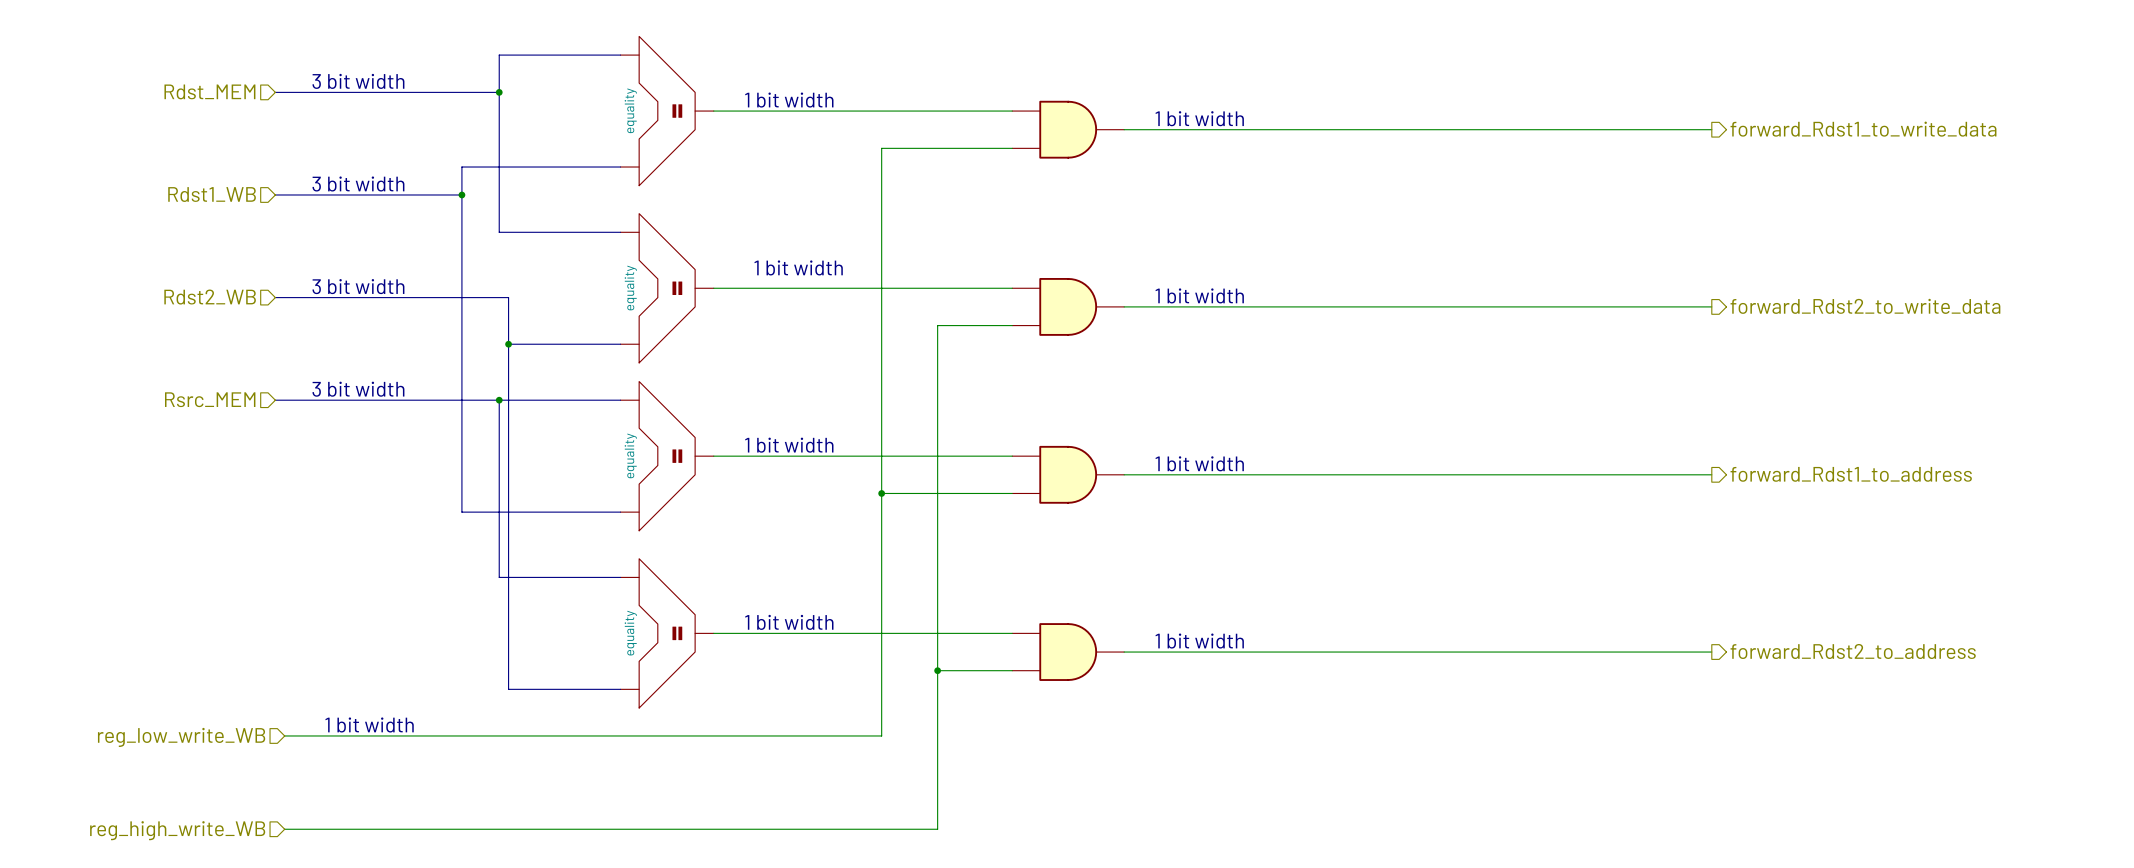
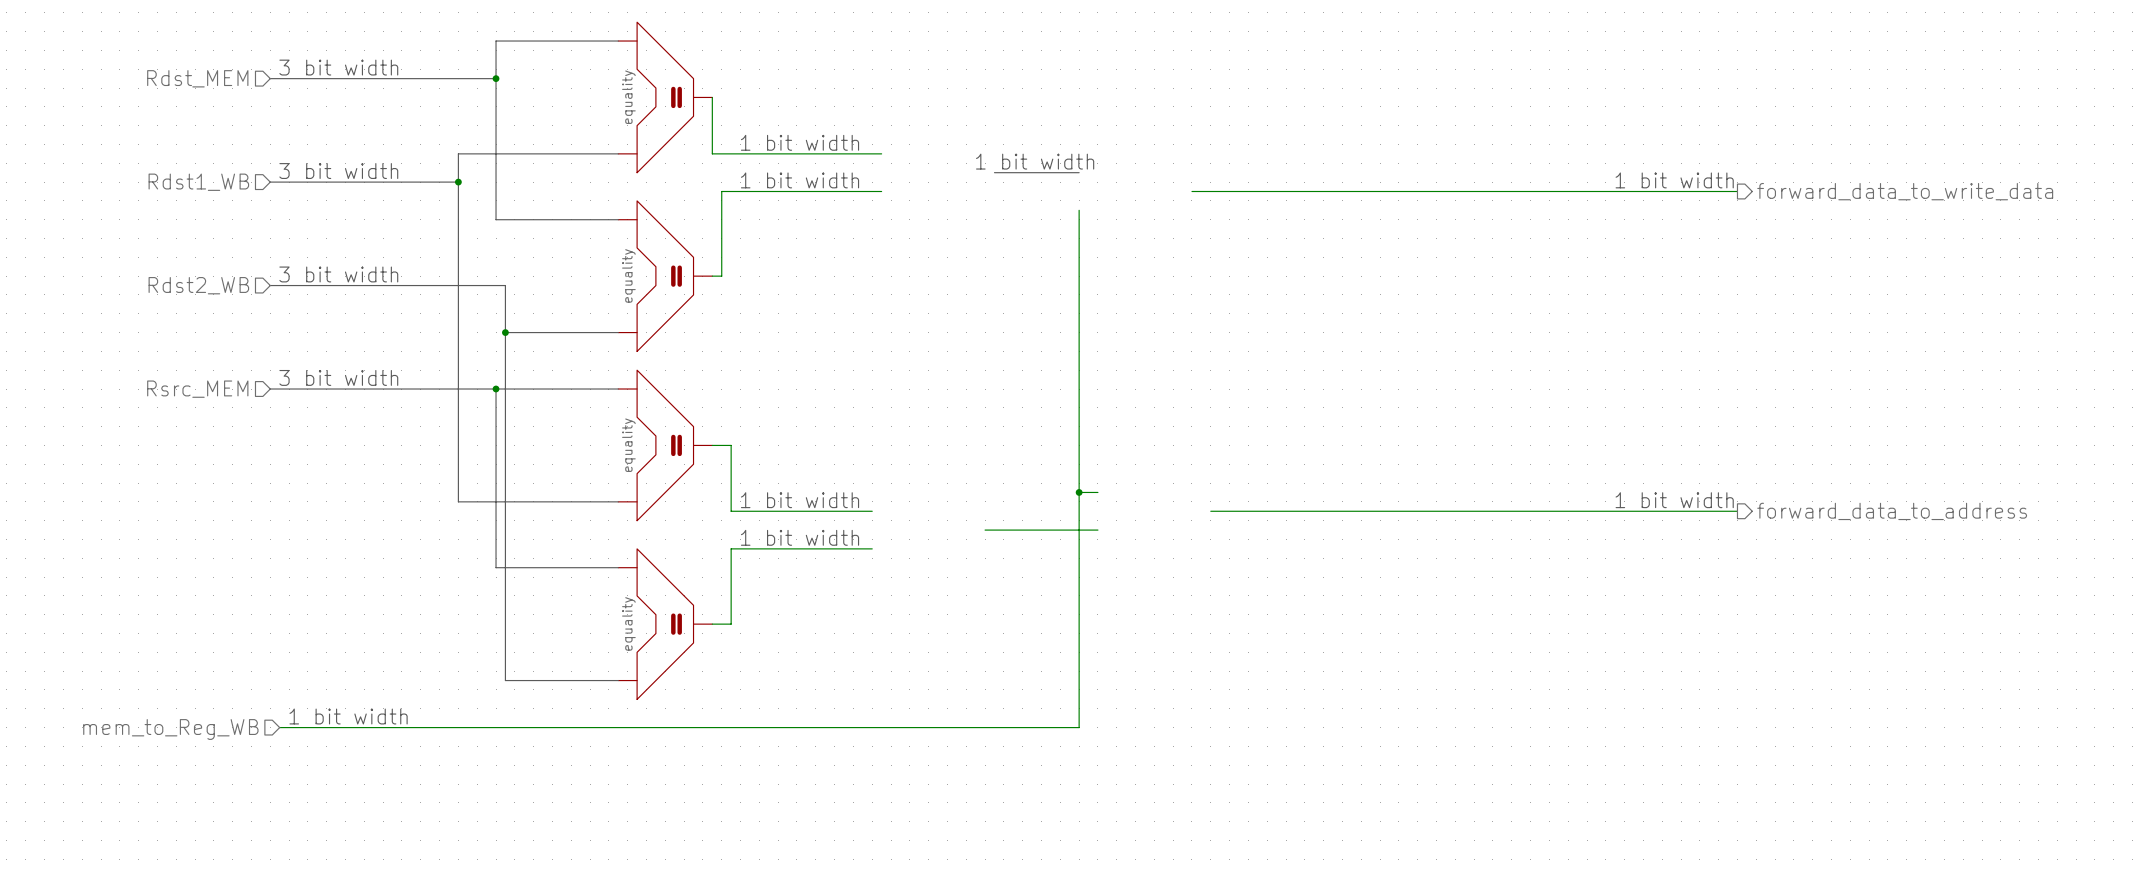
text: 1 bit width (789, 100) -> none
wire: (713, 111) (1012, 111) -> (712, 97) (712, 153) (881, 153)
text: 1 bit width (1199, 118) -> none
part: (1068, 129) -> none
wire: (1124, 129) (1711, 129) -> none
hierarchical label: forward_Rdst1_to_write_data (1863, 129) -> none
wire: (1012, 148) (881, 148) (881, 735) -> (1079, 210) (1079, 727) (881, 727)
text: none -> 1 bit width (800, 142)
text: none -> 1 bit width (1035, 161)
bus: none -> (994, 172) (1079, 172)
text: none -> 1 bit width (800, 180)
text: none -> 1 bit width (1674, 180)
hierarchical label: none -> forward_data_to_write_data (1905, 191)
wire: none -> (1191, 191) (1737, 191)
text: 1 bit width (798, 267) -> none
wire: (723, 288) (1012, 288) -> (721, 276) (721, 191) (881, 191)
text: 1 bit width (1199, 295) -> none
part: (1068, 306) -> none
wire: (1124, 306) (1711, 306) -> none
hierarchical label: forward_Rdst2_to_write_data (1865, 306) -> none
wire: (1012, 325) (937, 325) (937, 829) (284, 829) -> none
text: 1 bit width (789, 445) -> none
wire: (732, 456) (1012, 456) -> (731, 445) (731, 511) (872, 511)
text: 1 bit width (1199, 463) -> none
part: (1068, 474) -> none
wire: (1124, 474) (1711, 474) -> none
hierarchical label: forward_Rdst1_to_address (1851, 474) -> none
wire: (881, 493) (1012, 493) -> none
junction: (881, 493) -> none
wire: none -> (1079, 492) (1097, 492)
junction: none -> (1079, 492)
text: none -> 1 bit width (800, 500)
text: none -> 1 bit width (1674, 500)
wire: none -> (1210, 511) (1737, 511)
hierarchical label: none -> forward_data_to_address (1892, 511)
wire: none -> (985, 530) (1097, 530)
text: none -> 1 bit width (800, 537)
text: 1 bit width (789, 622) -> none
wire: (732, 633) (1012, 633) -> (731, 624) (731, 548) (872, 548)
text: 1 bit width (1199, 641) -> none
hierarchical label: forward_Rdst2_to_address (1853, 651) -> none
part: (1068, 652) -> none
wire: (1124, 652) (1711, 652) -> none
wire: (937, 670) (1012, 670) -> none
junction: (937, 670) -> none
hierarchical label: reg_low_write_WB (181, 737) -> mem_to_Reg_WB (170, 729)
hierarchical label: reg_high_write_WB (177, 830) -> none

